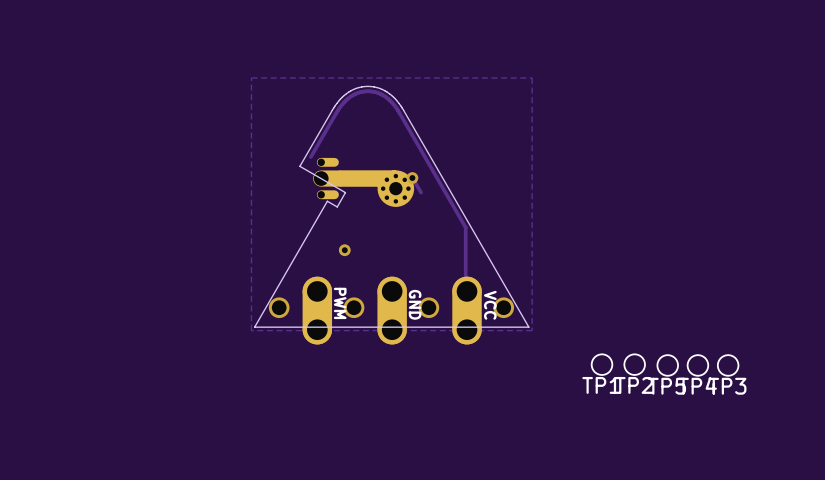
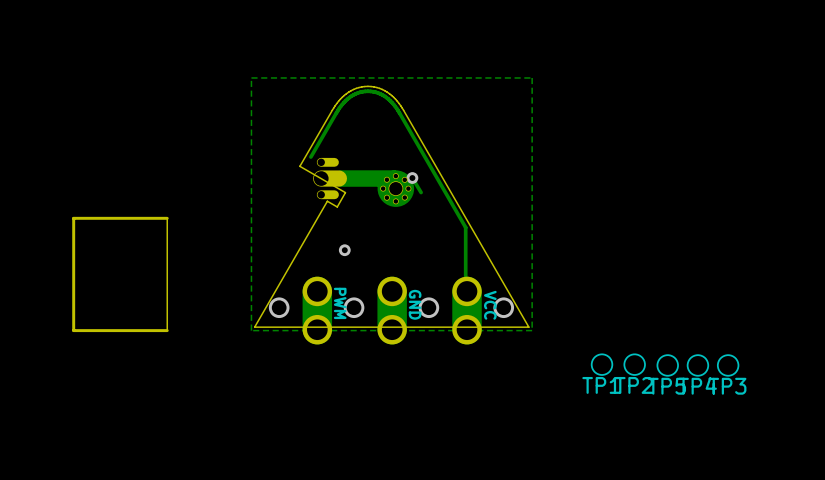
board edge: none -> (167, 218) (73, 218) (73, 330) (167, 330) (167, 218)

